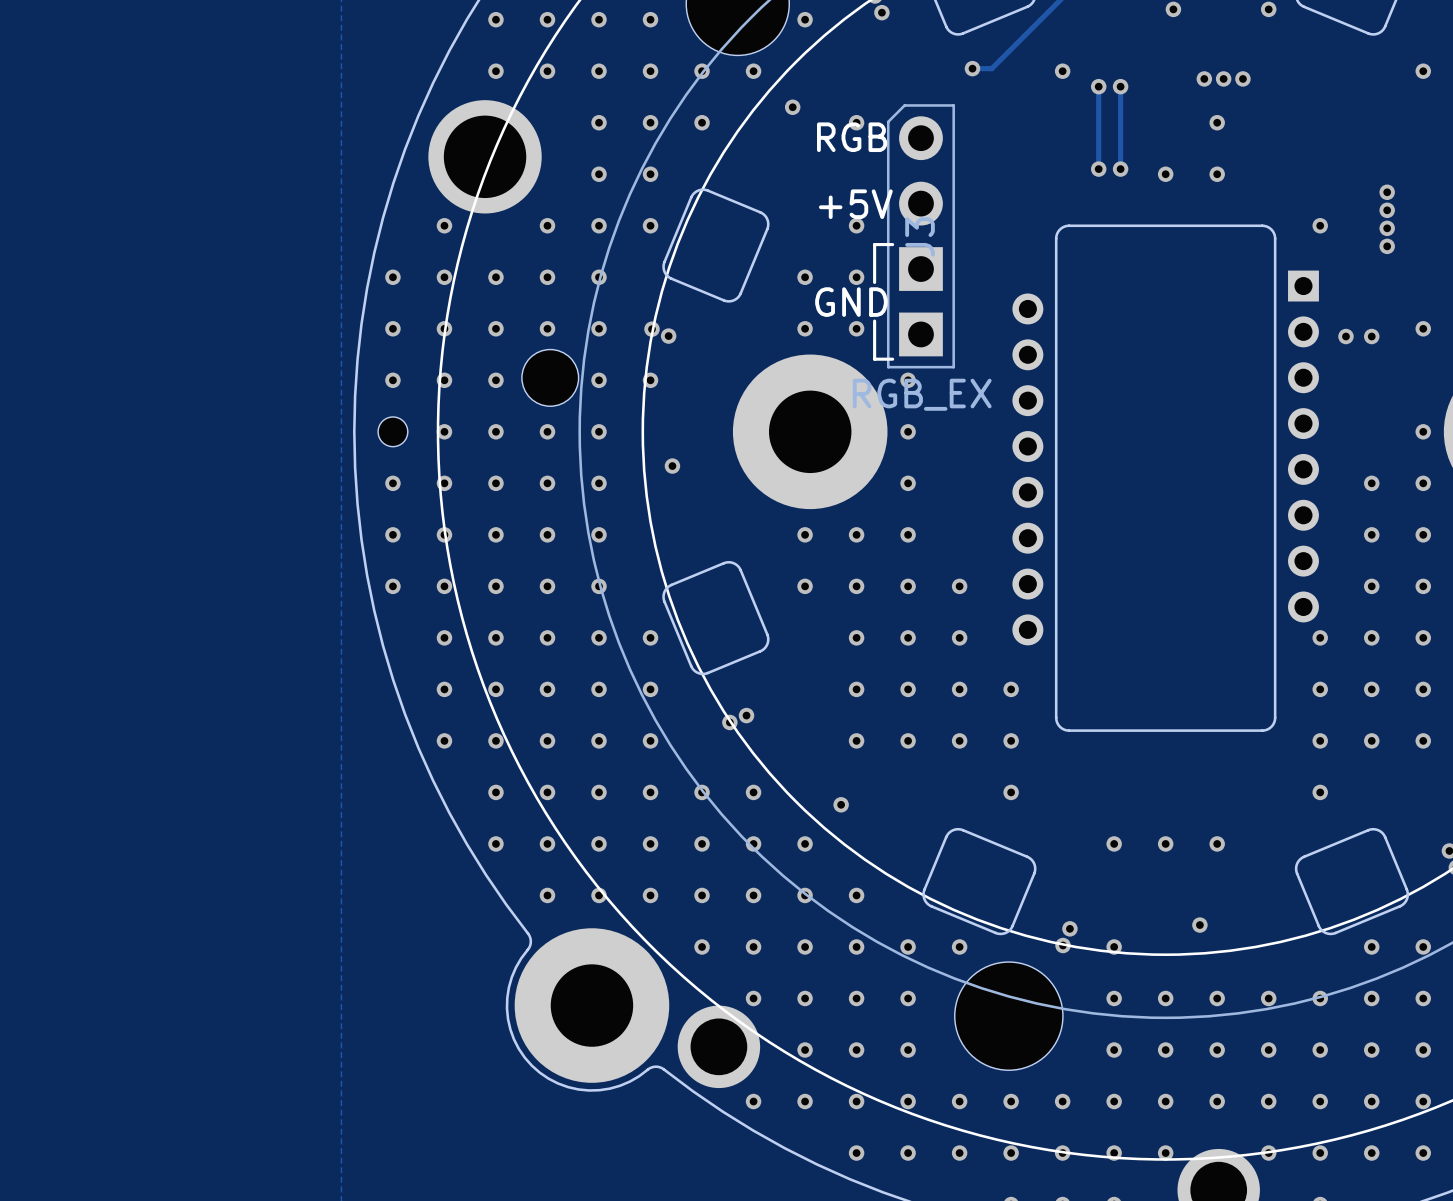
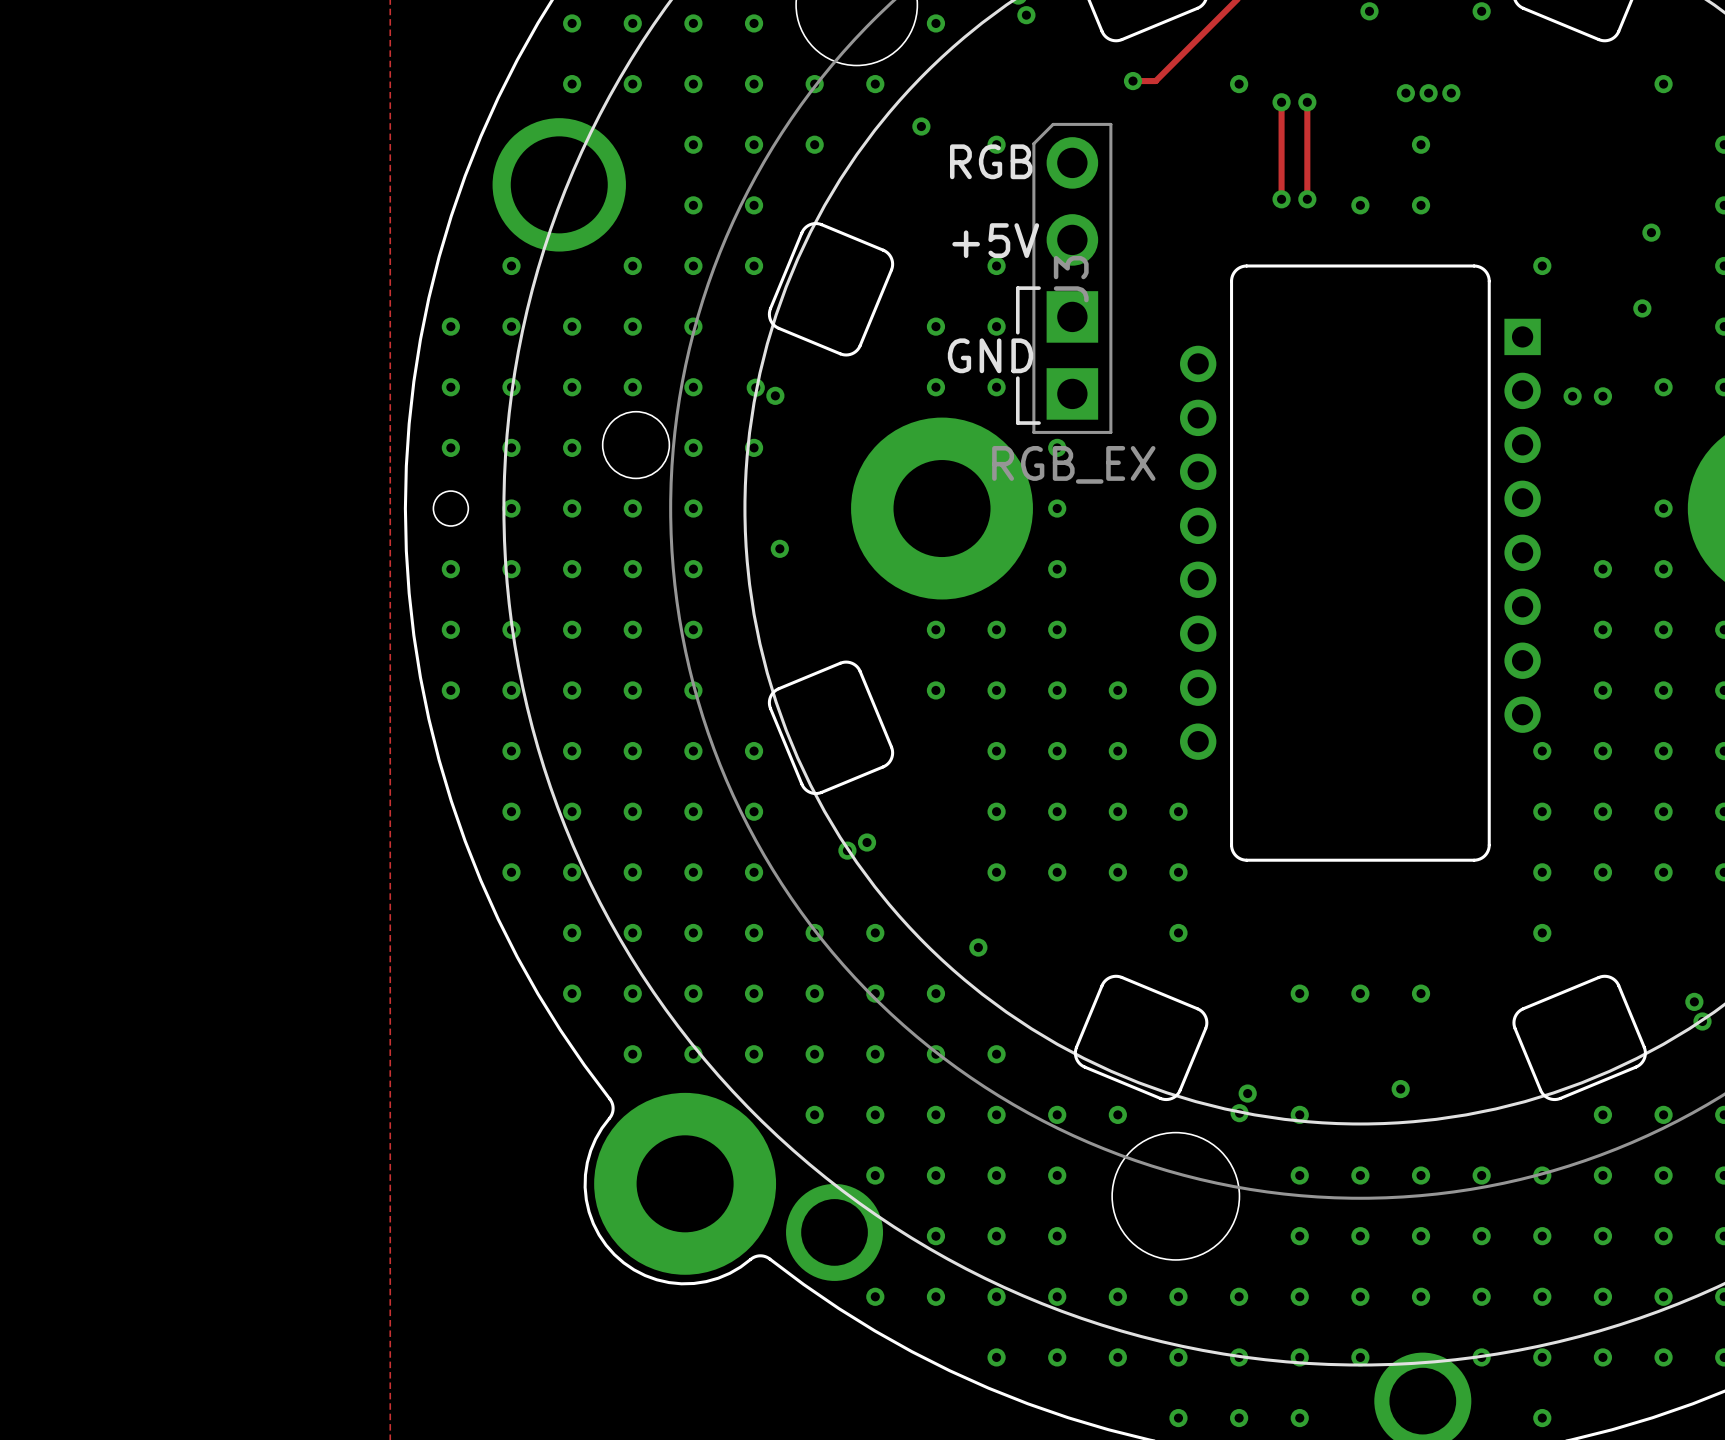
via: (1387, 192) -> none
via: none -> (1651, 232)
via: (1387, 210) -> none
via: (1387, 228) -> none
via: (1387, 246) -> none
via: none -> (1642, 308)

